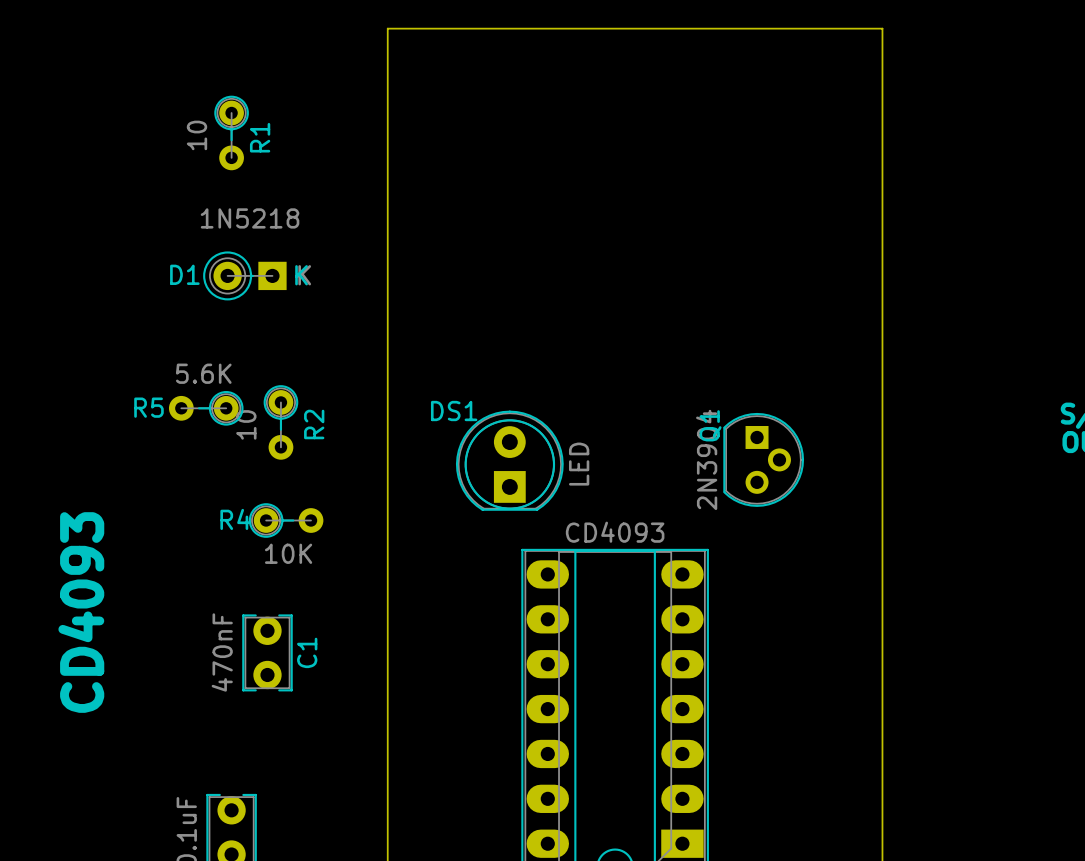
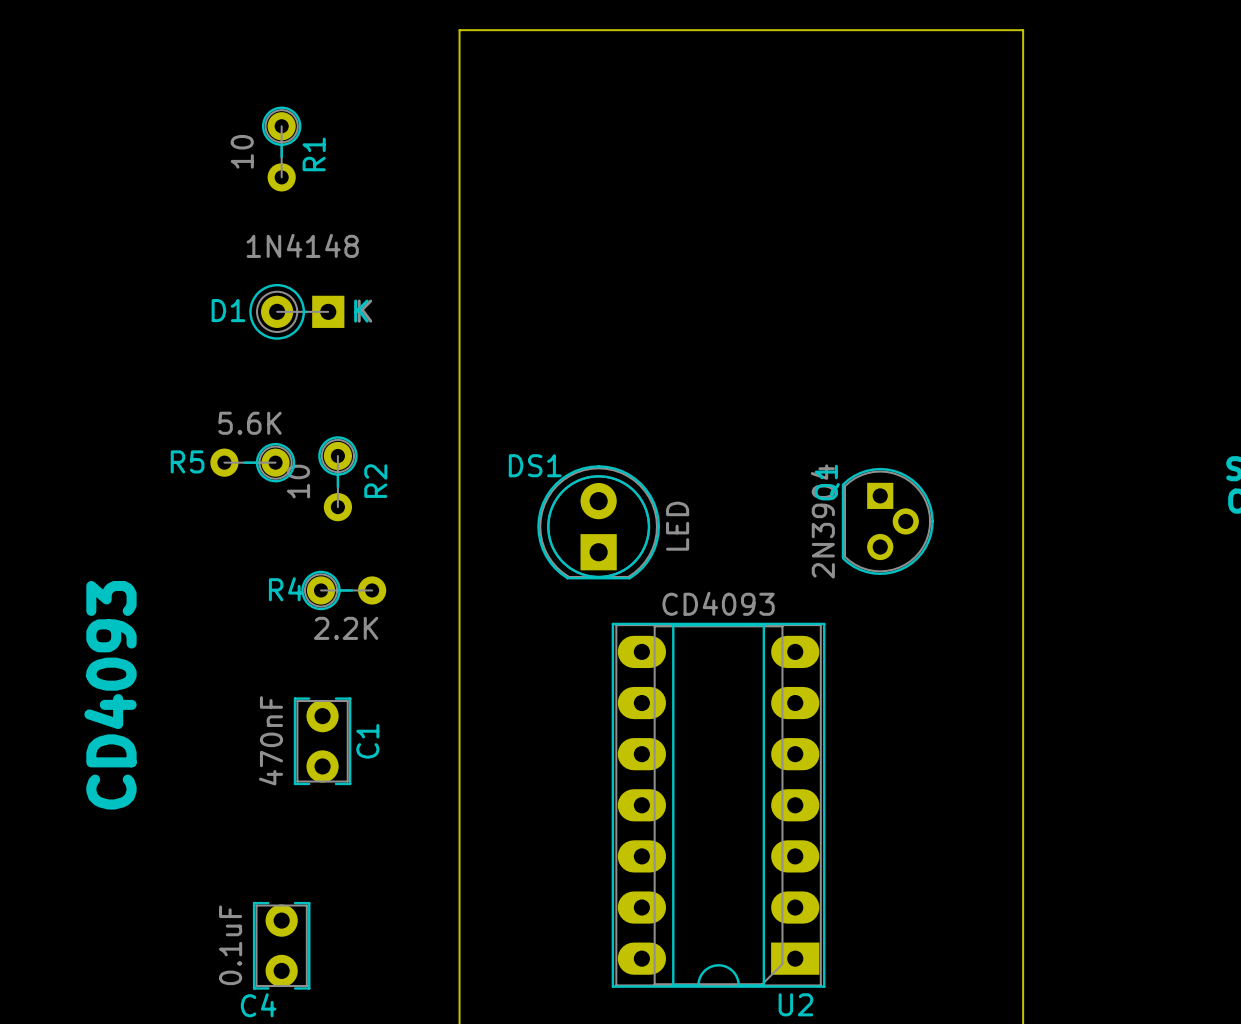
D1 value: 1N5218 (250, 218) -> 1N4148 (302, 245)
R4 value: 10K (288, 553) -> 2.2K (346, 628)

